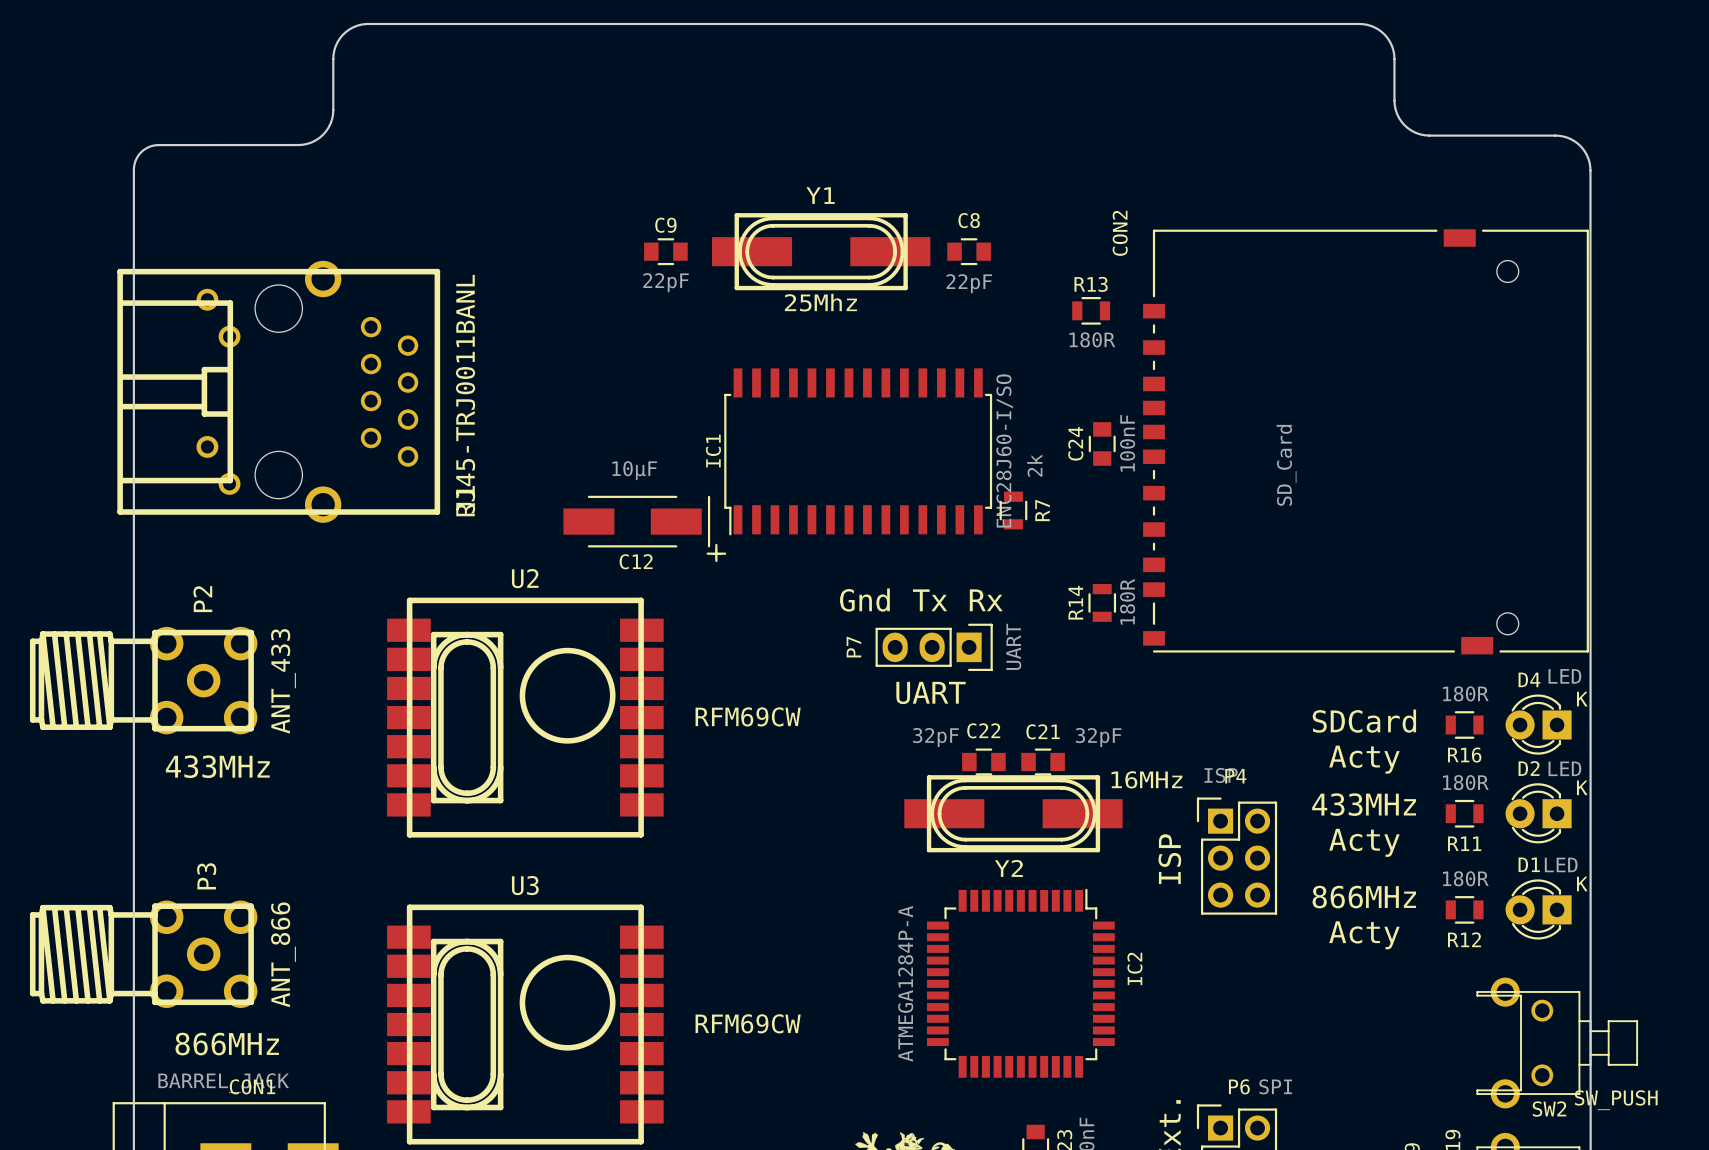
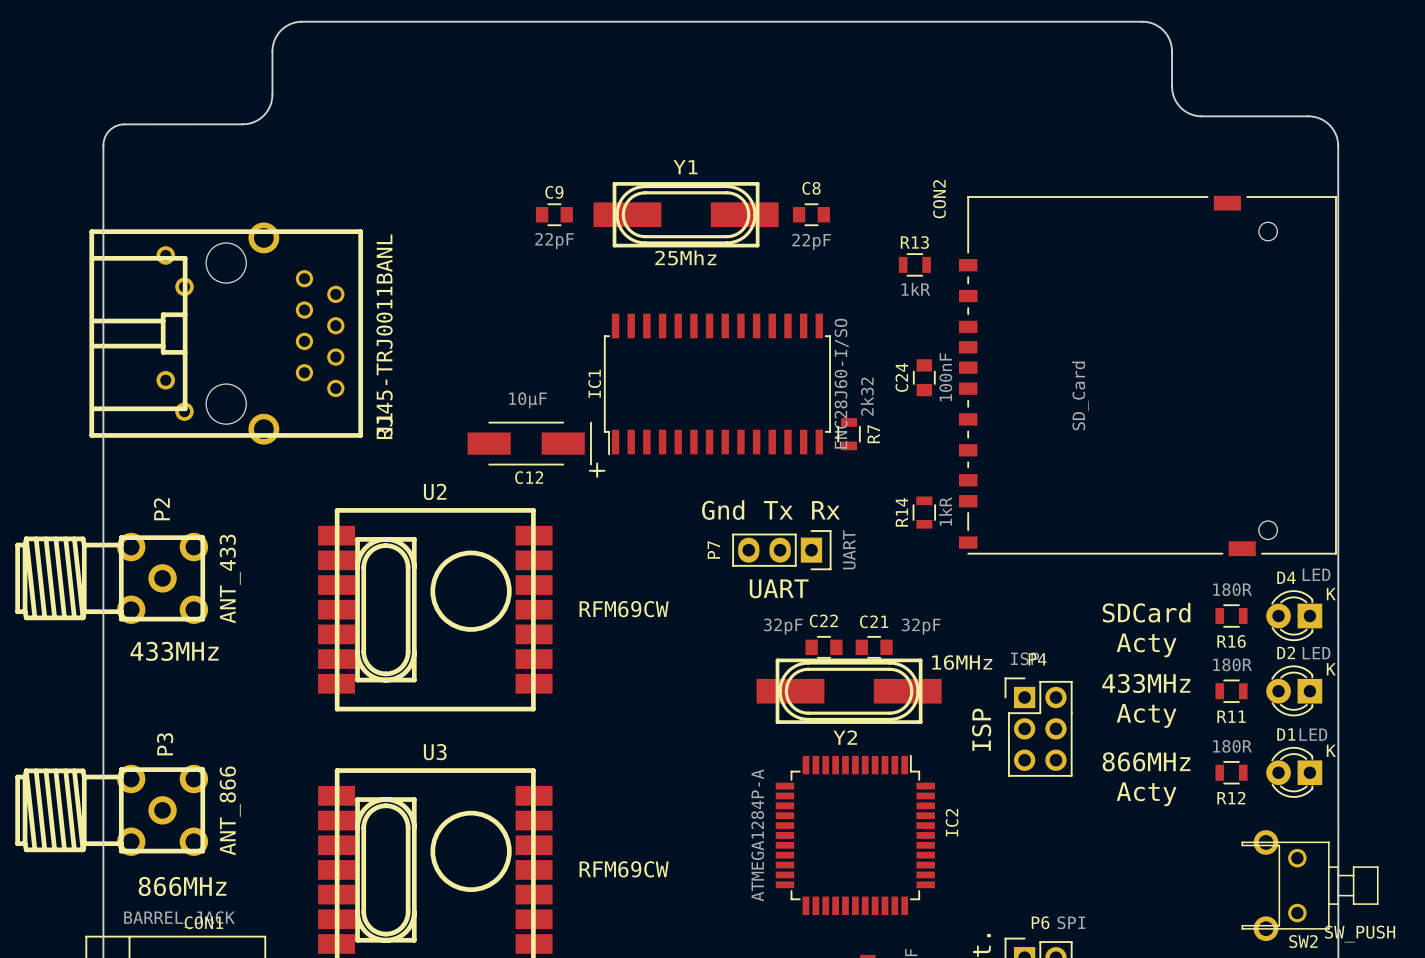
R13 value: 180R (1092, 339) -> 1kR (915, 289)
R7 value: 2k (1034, 465) -> 2k32 (867, 396)
R14 value: 180R (1127, 601) -> 1kR (945, 511)

